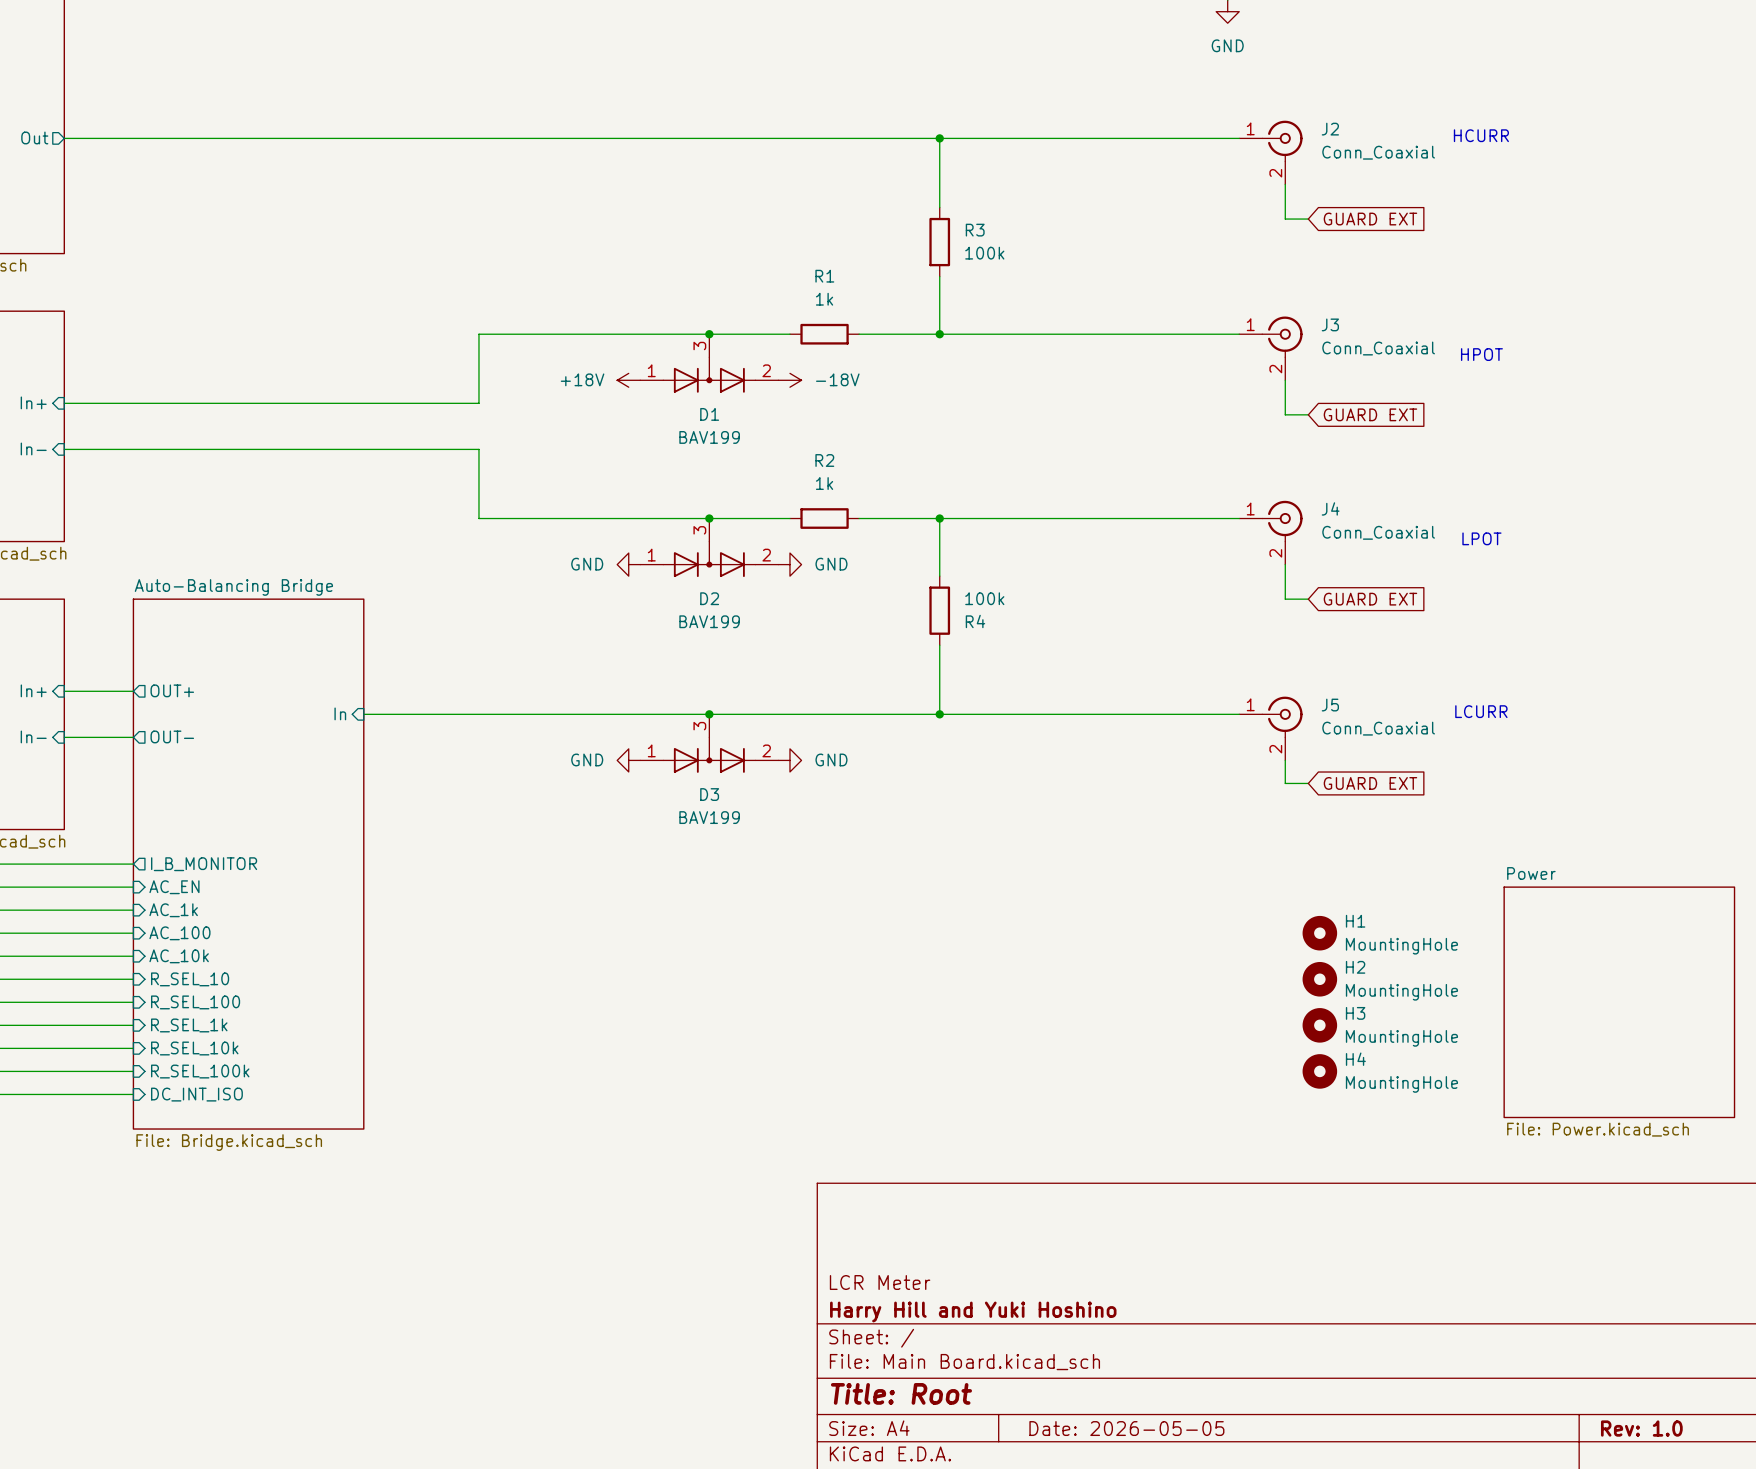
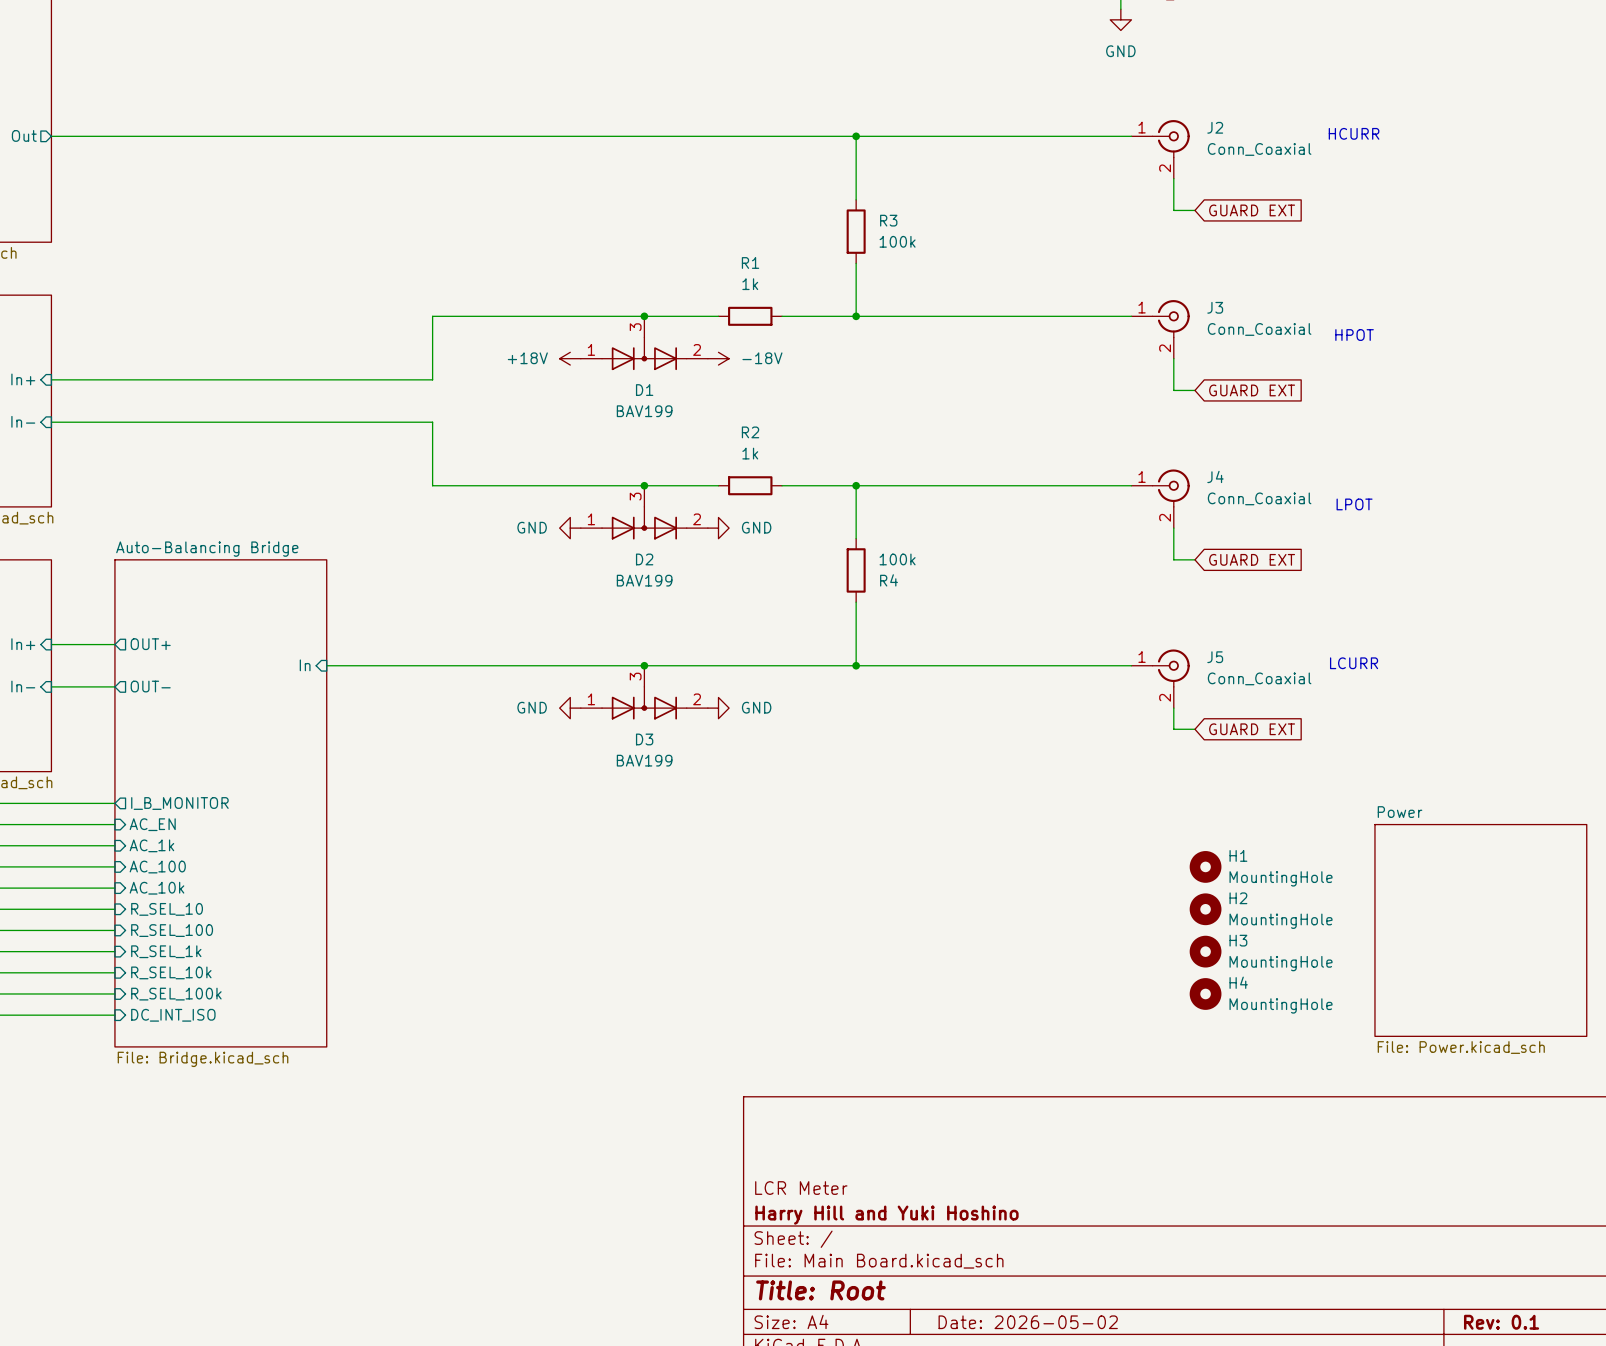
title block: Date: 2026-05-05 (1126, 1428) -> Date: 2026-05-02 (1028, 1322)
title block: Rev: 1.0 (1641, 1428) -> Rev: 0.1 (1501, 1322)

